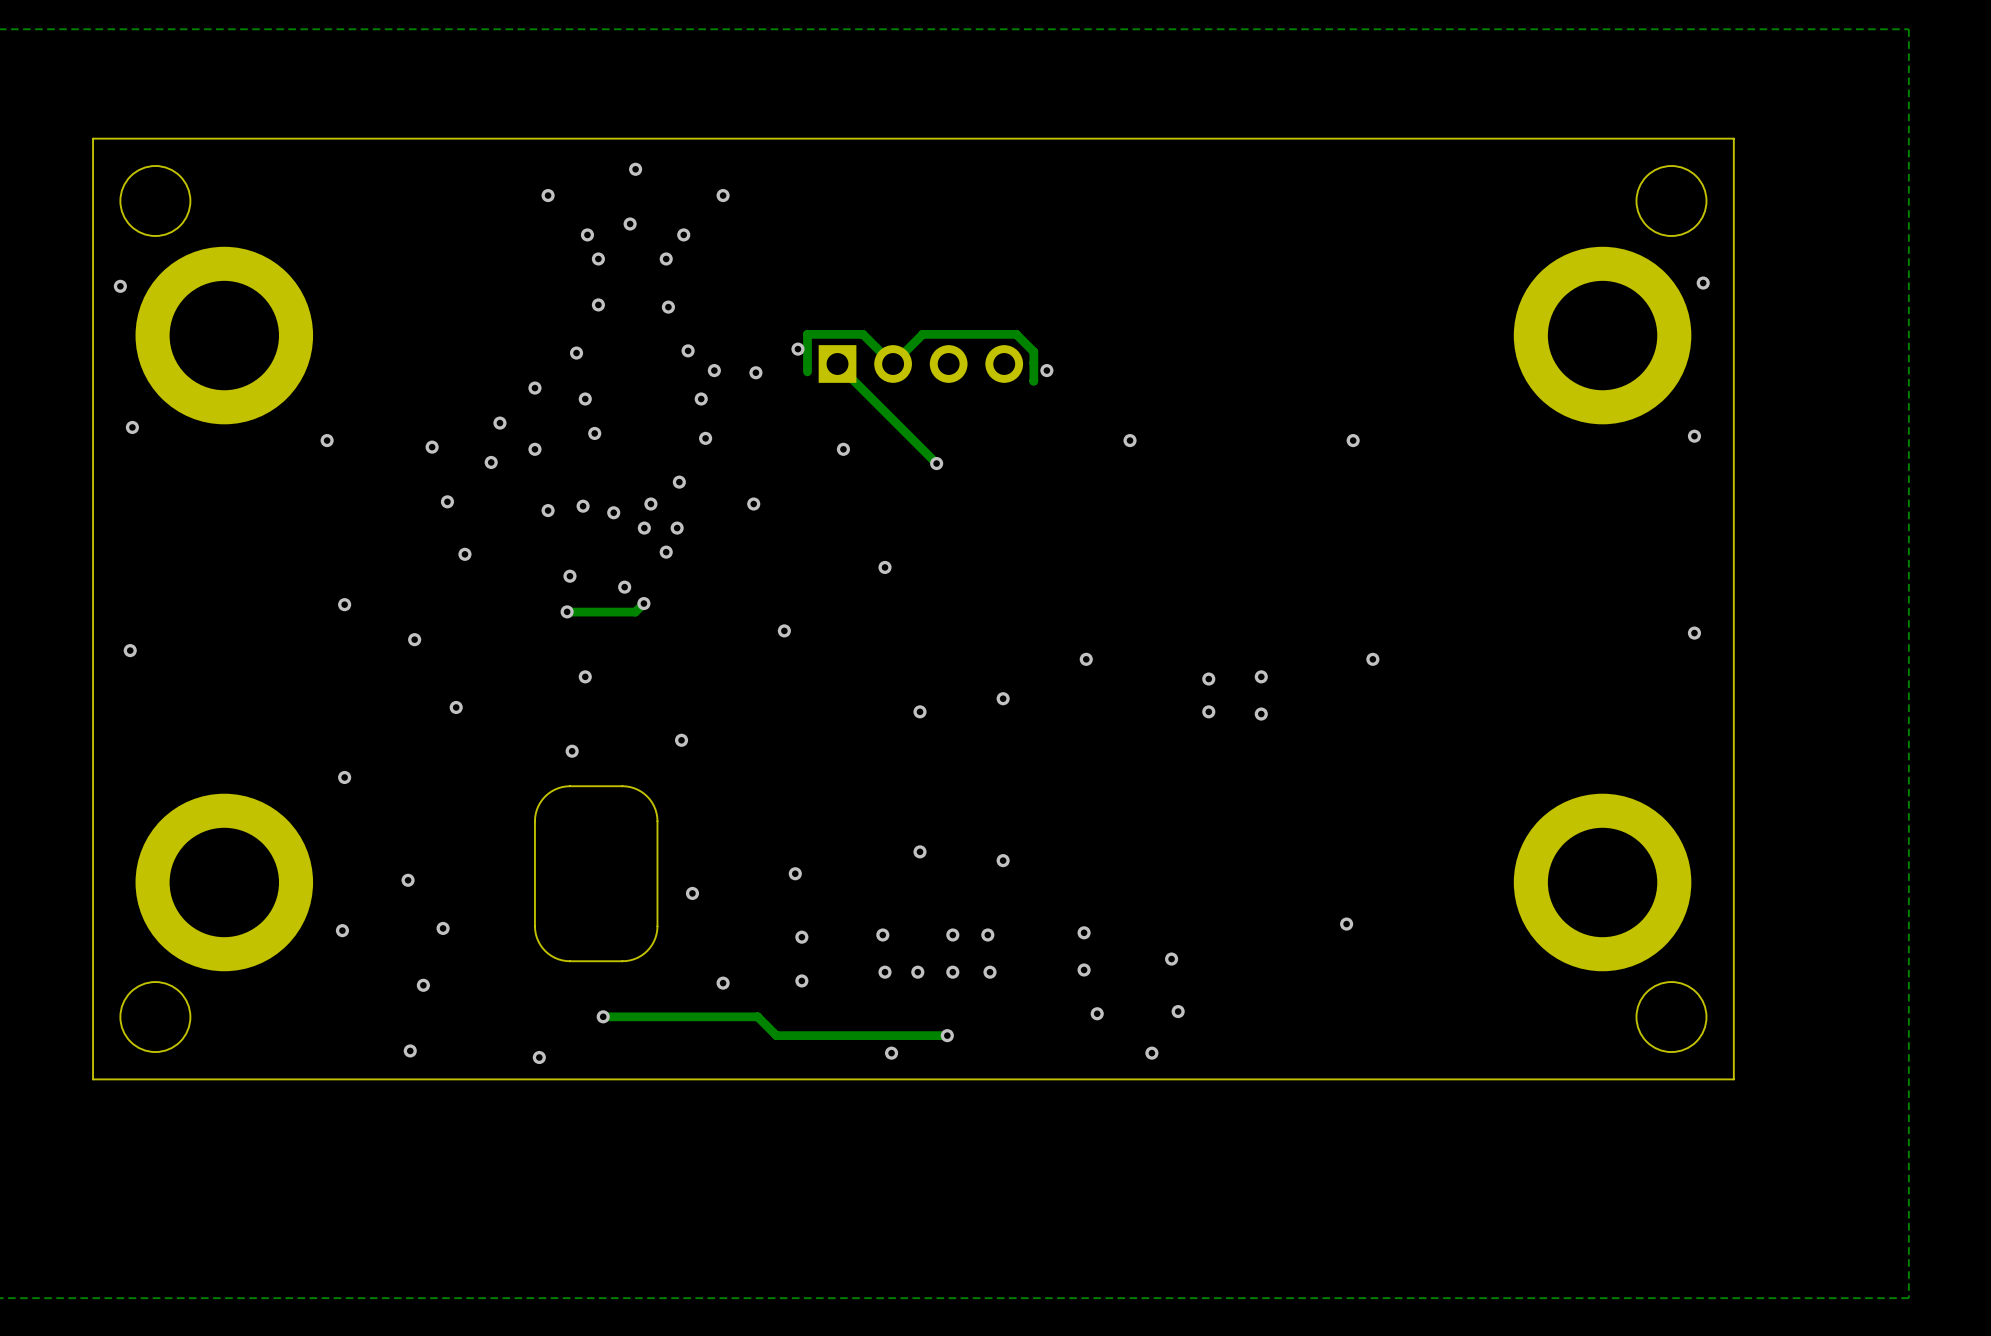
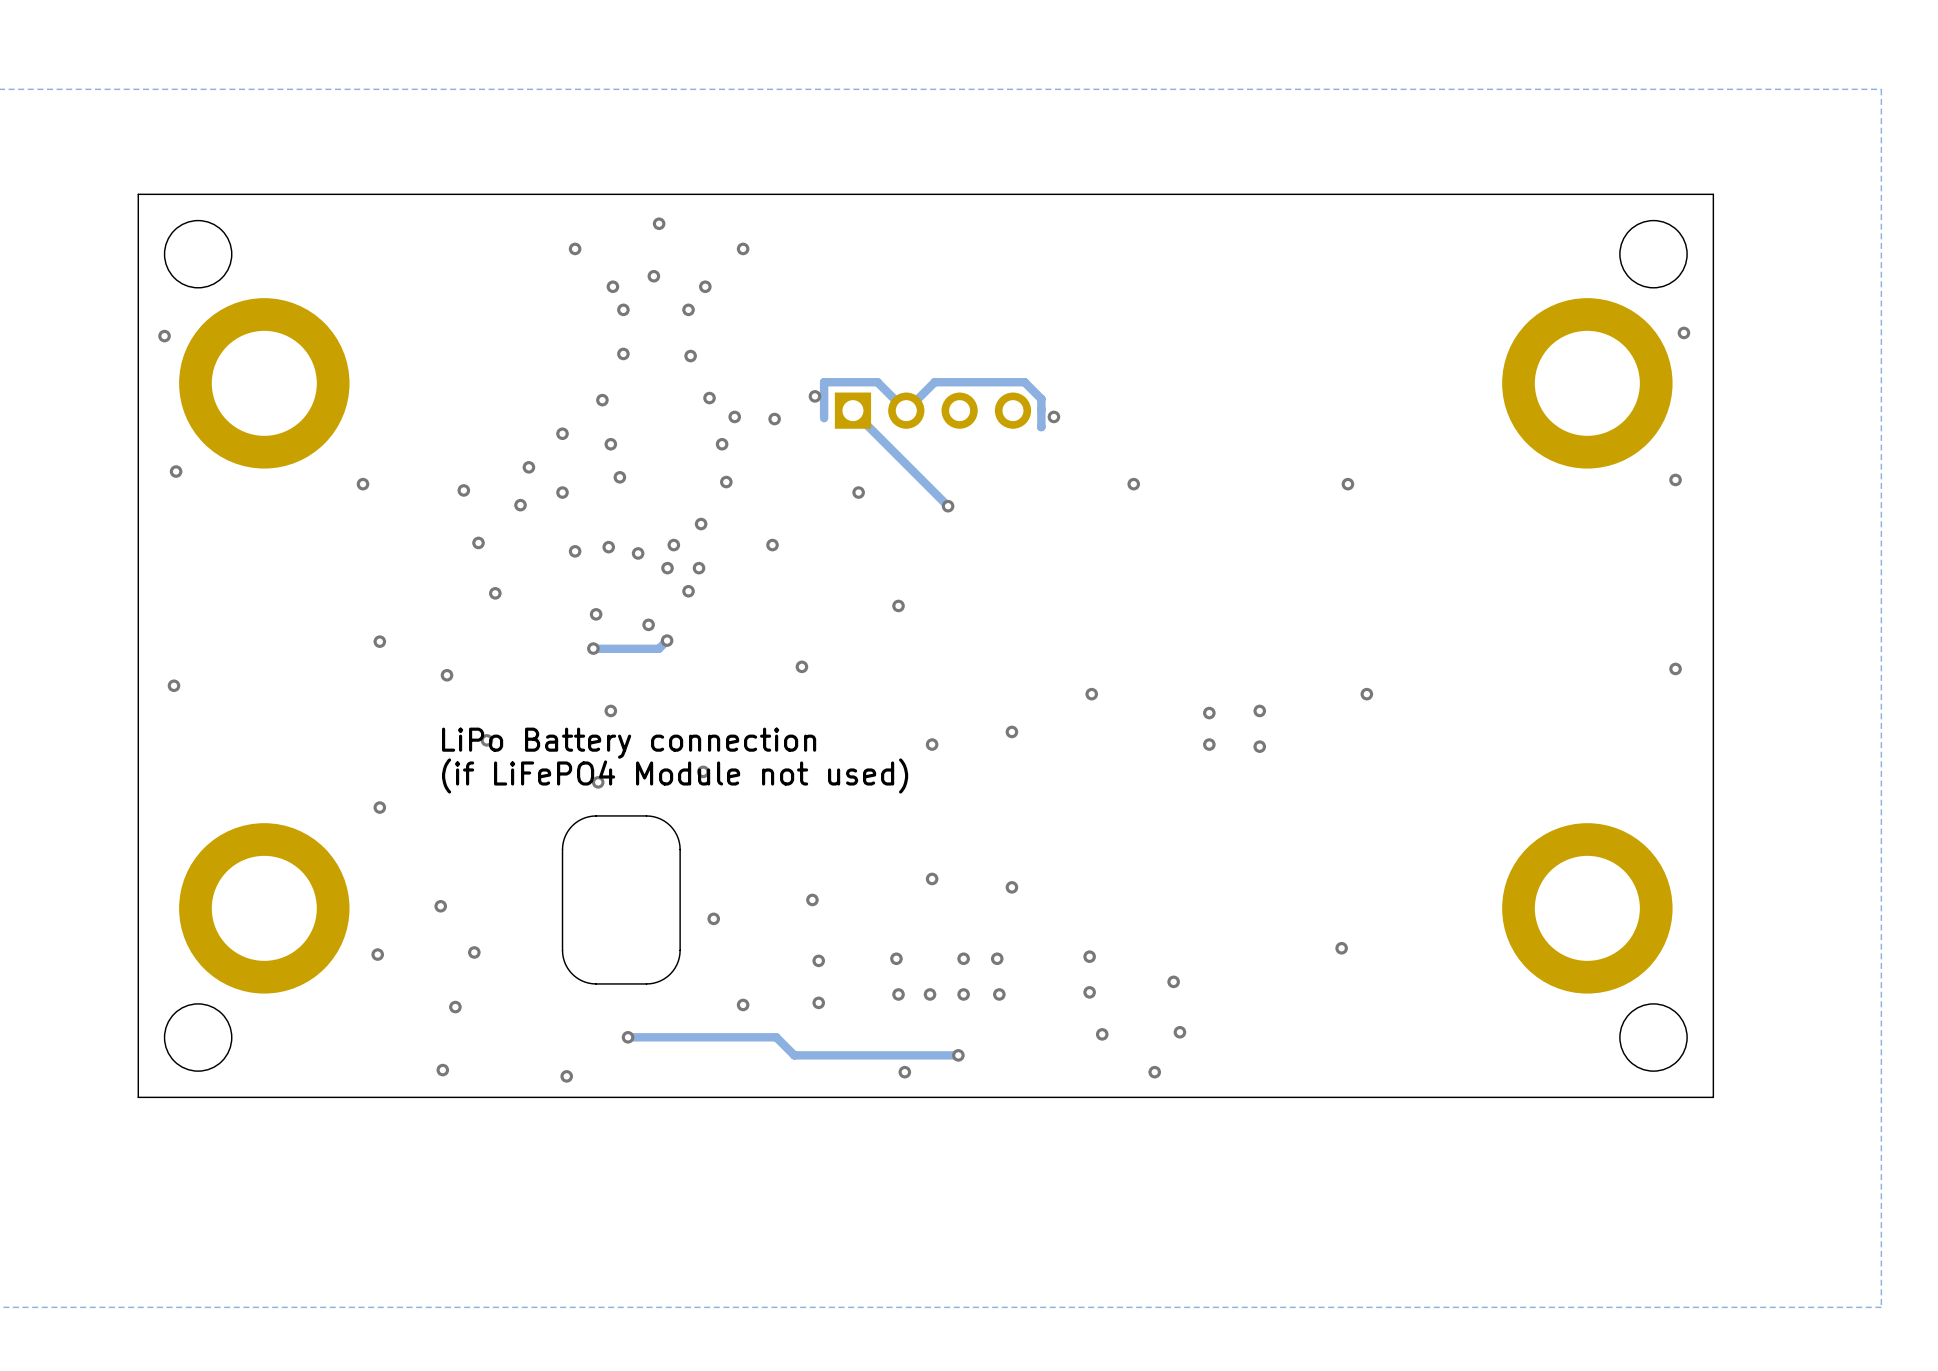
text: none -> LiPo Battery connection (629, 743)
text: none -> (if LiFePO4 Module not used) (675, 775)

